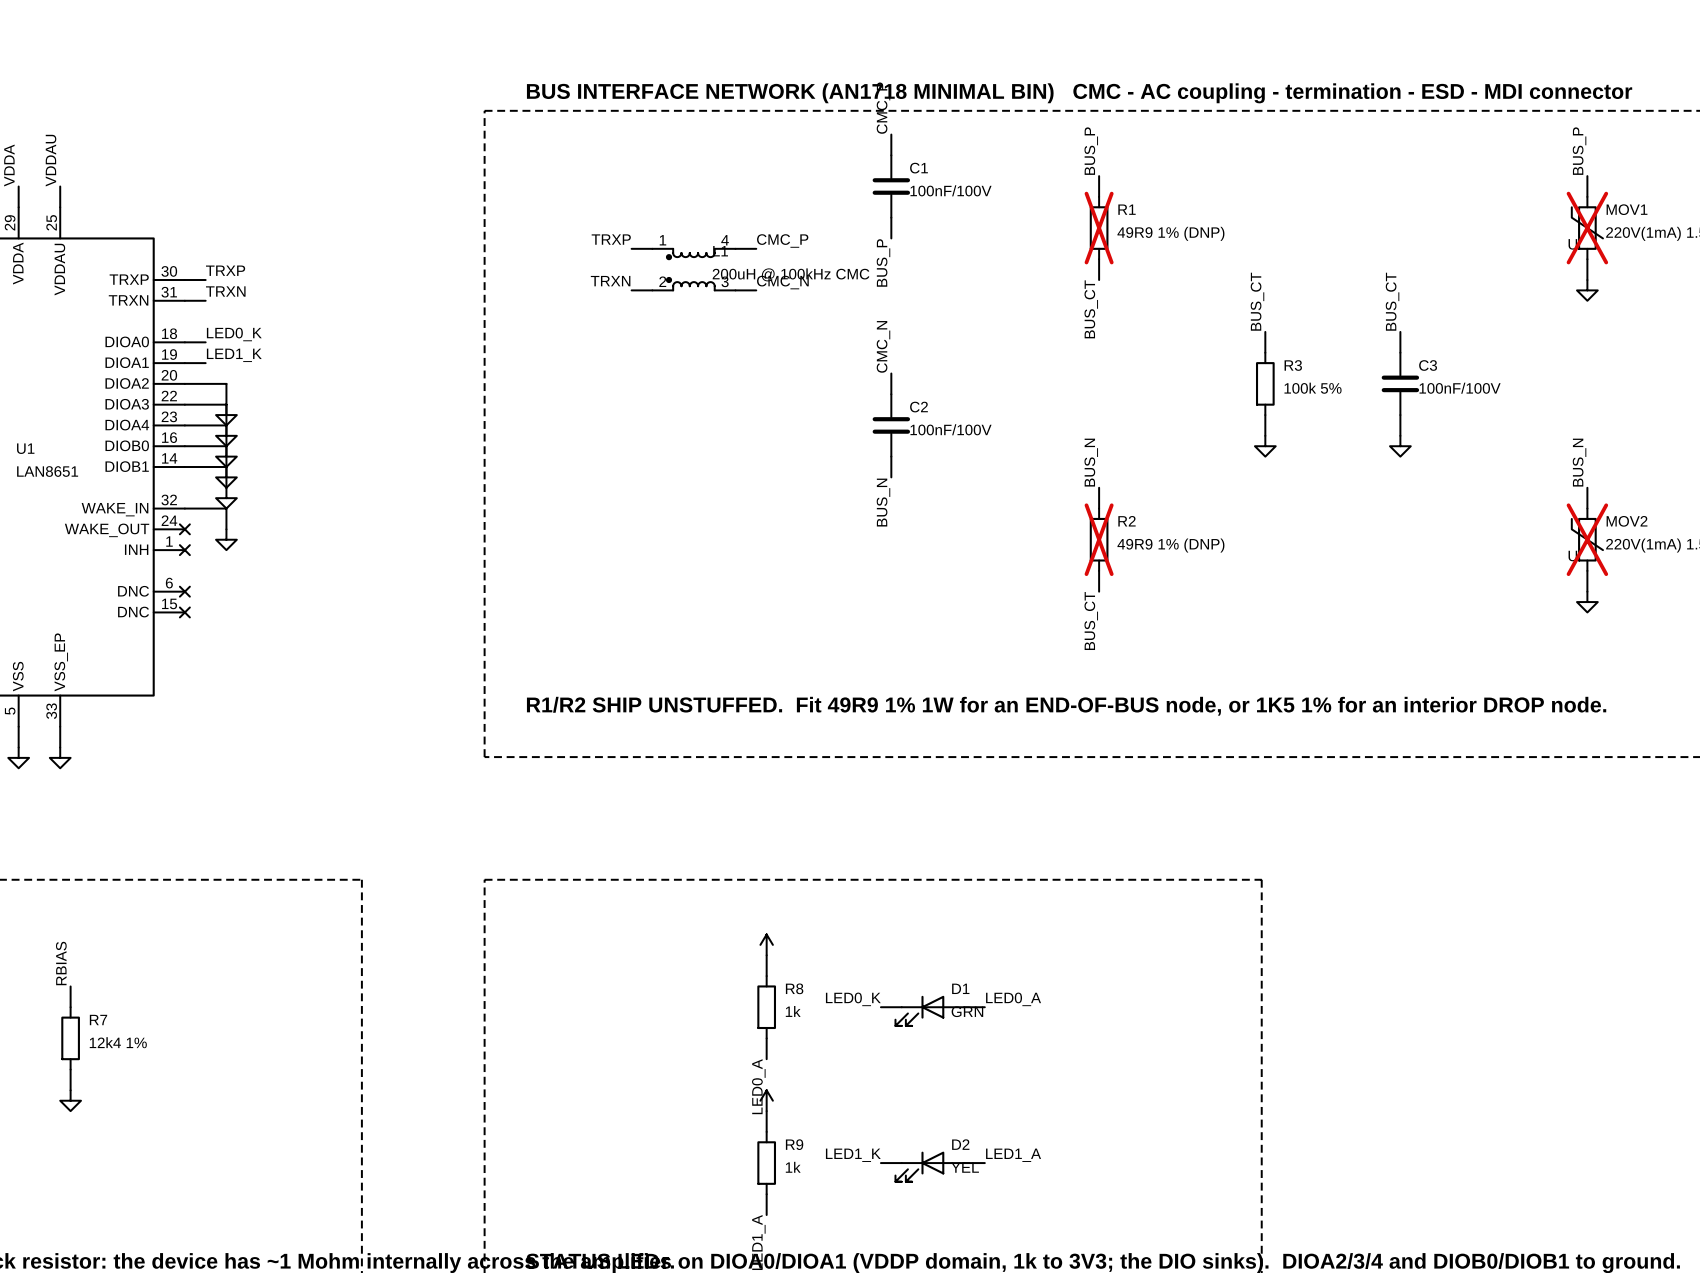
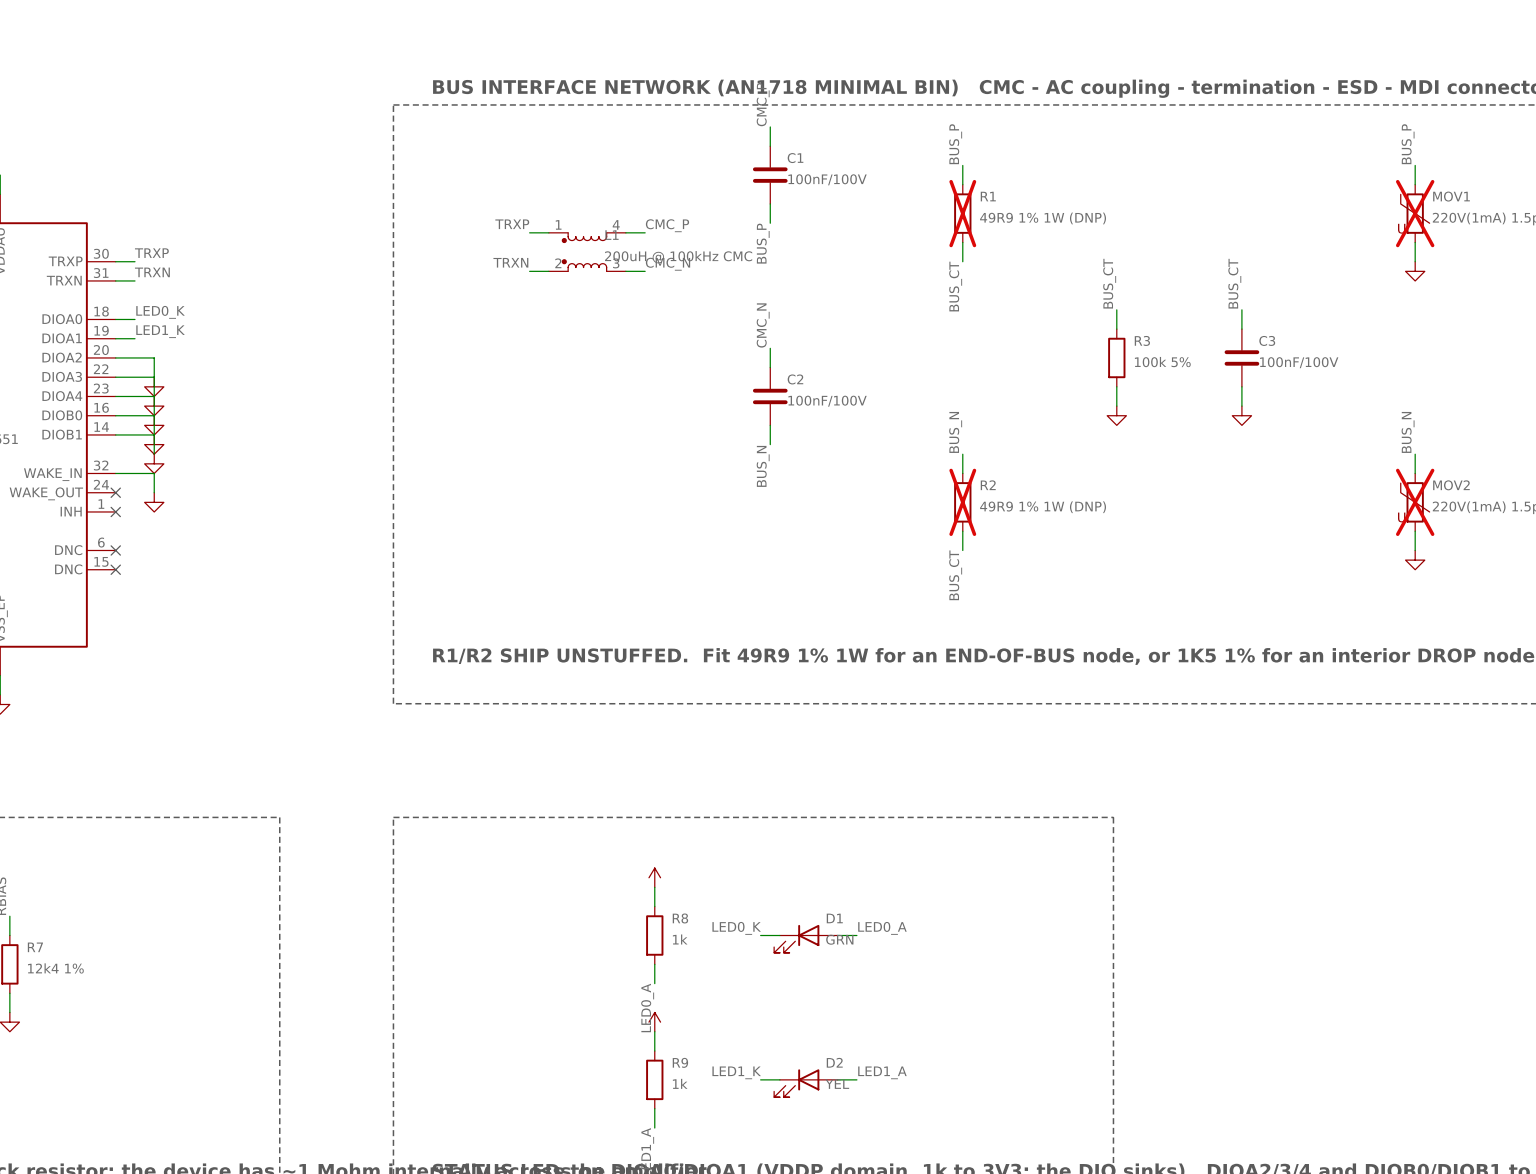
R1 value: 49R9 1% (DNP) (1170, 233) -> 49R9 1% 1W (DNP) (1043, 218)
R2 value: 49R9 1% (DNP) (1170, 545) -> 49R9 1% 1W (DNP) (1043, 507)

